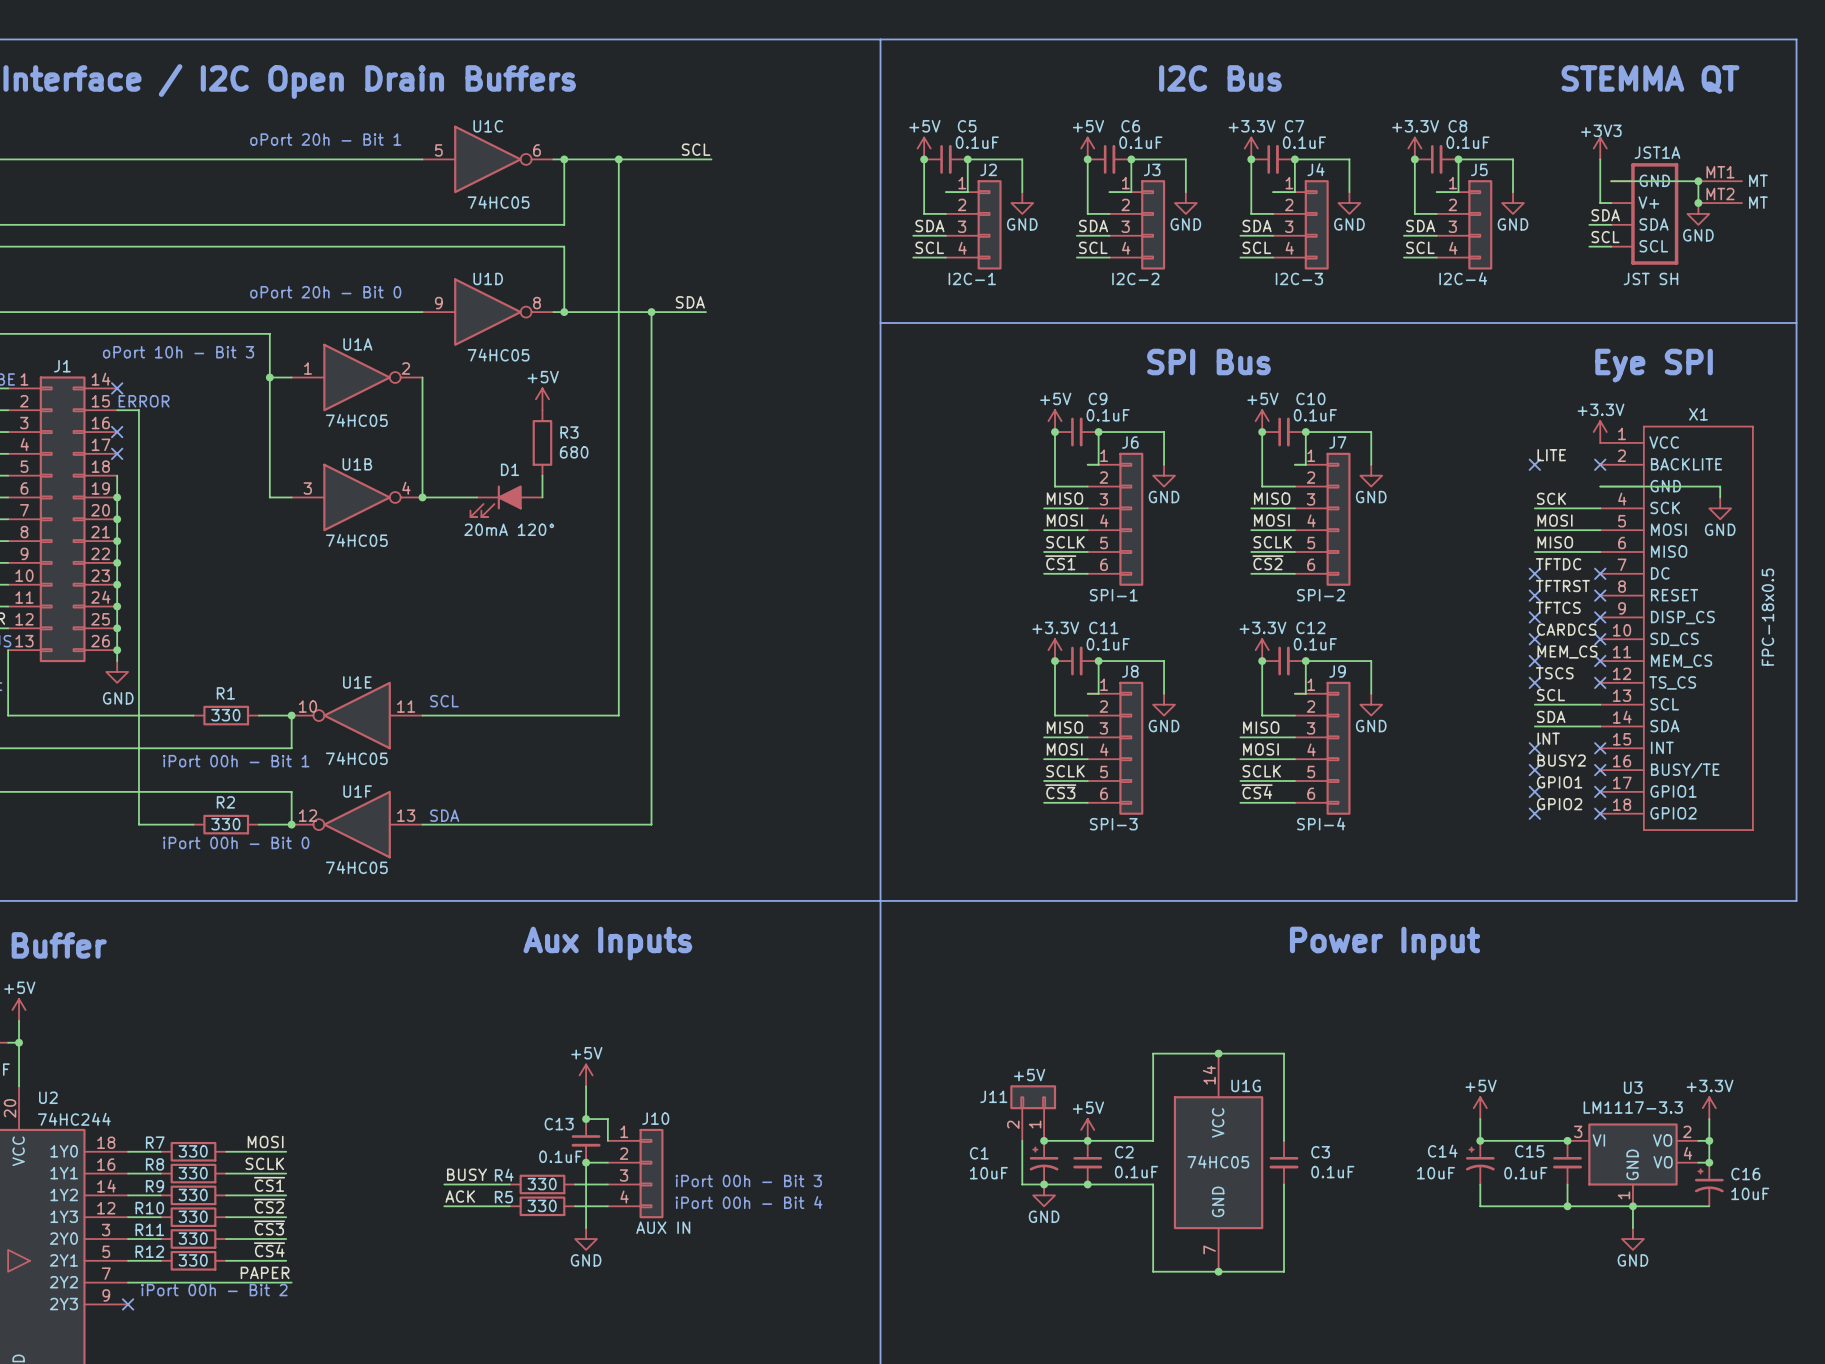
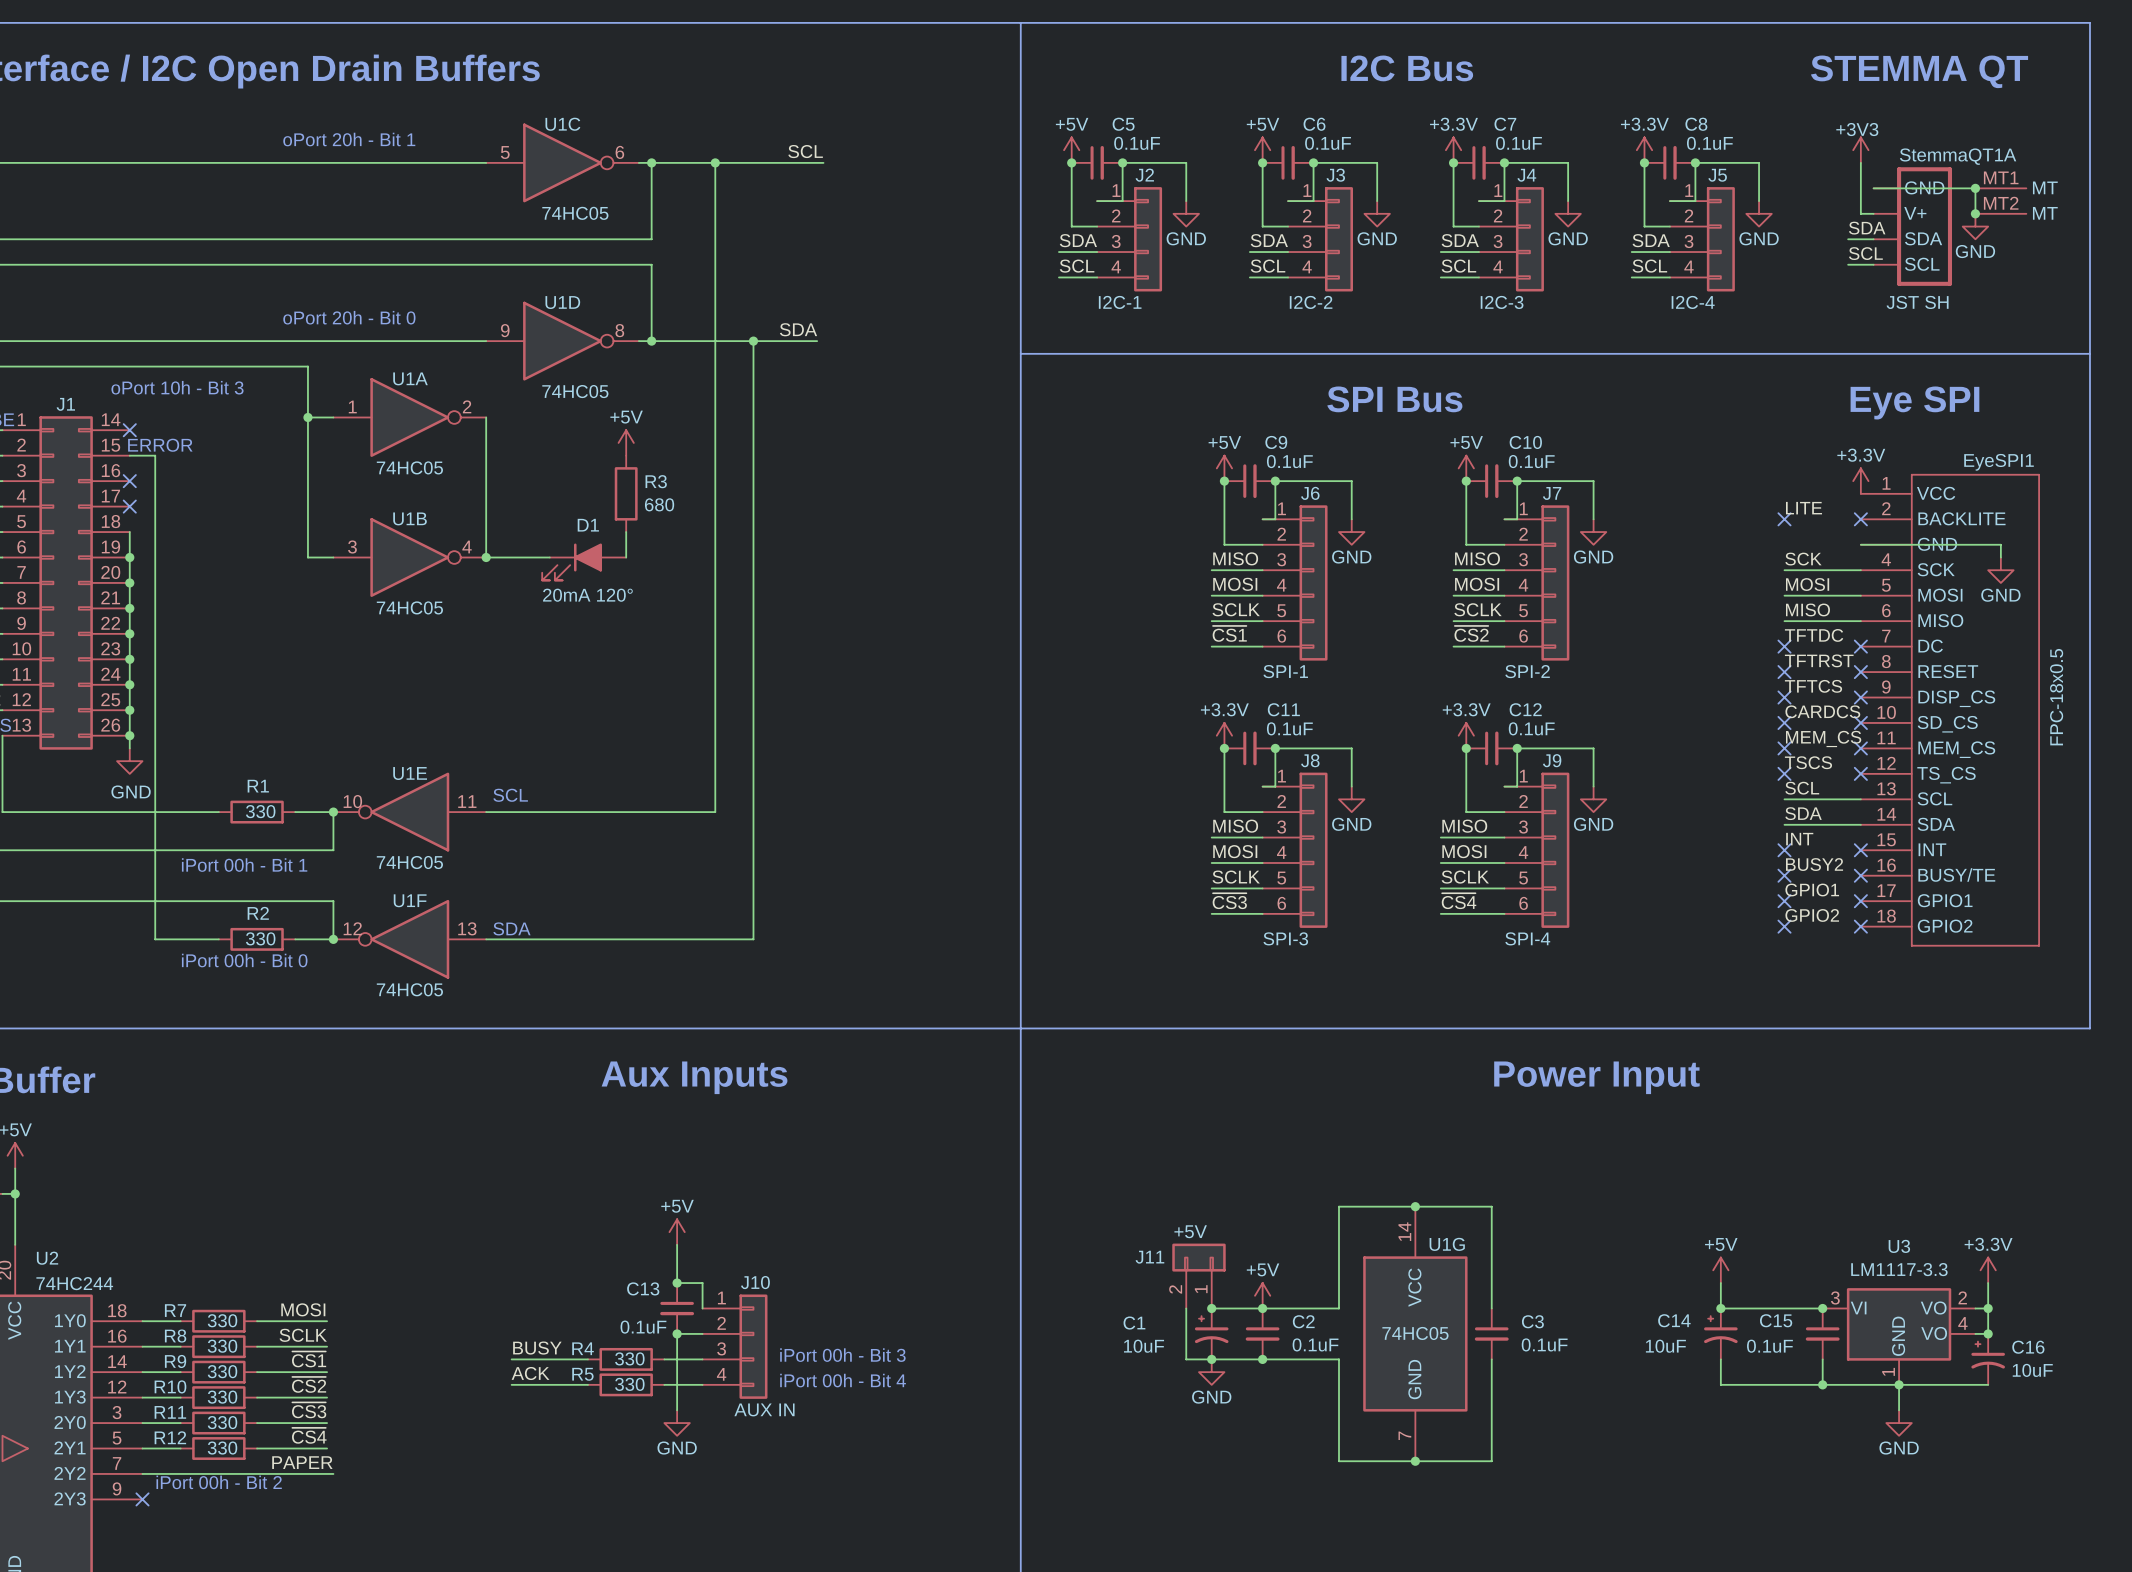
JST1A name: JST1A (1657, 152) -> StemmaQT1A (1958, 156)
X1 name: X1 (1698, 414) -> EyeSPI1 (1999, 462)

